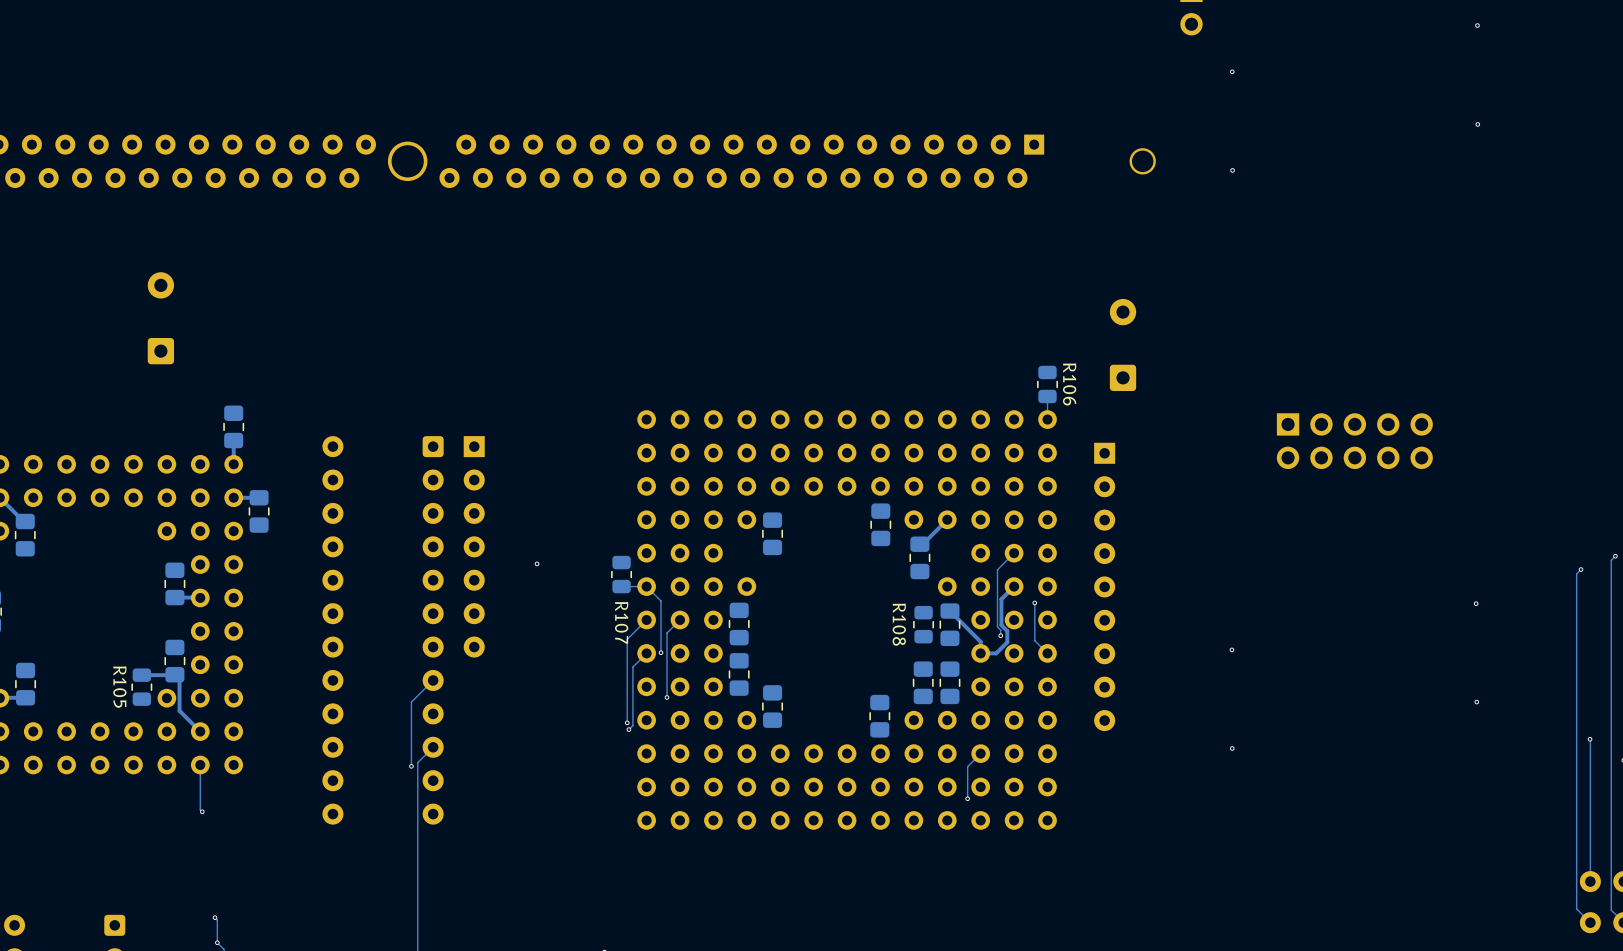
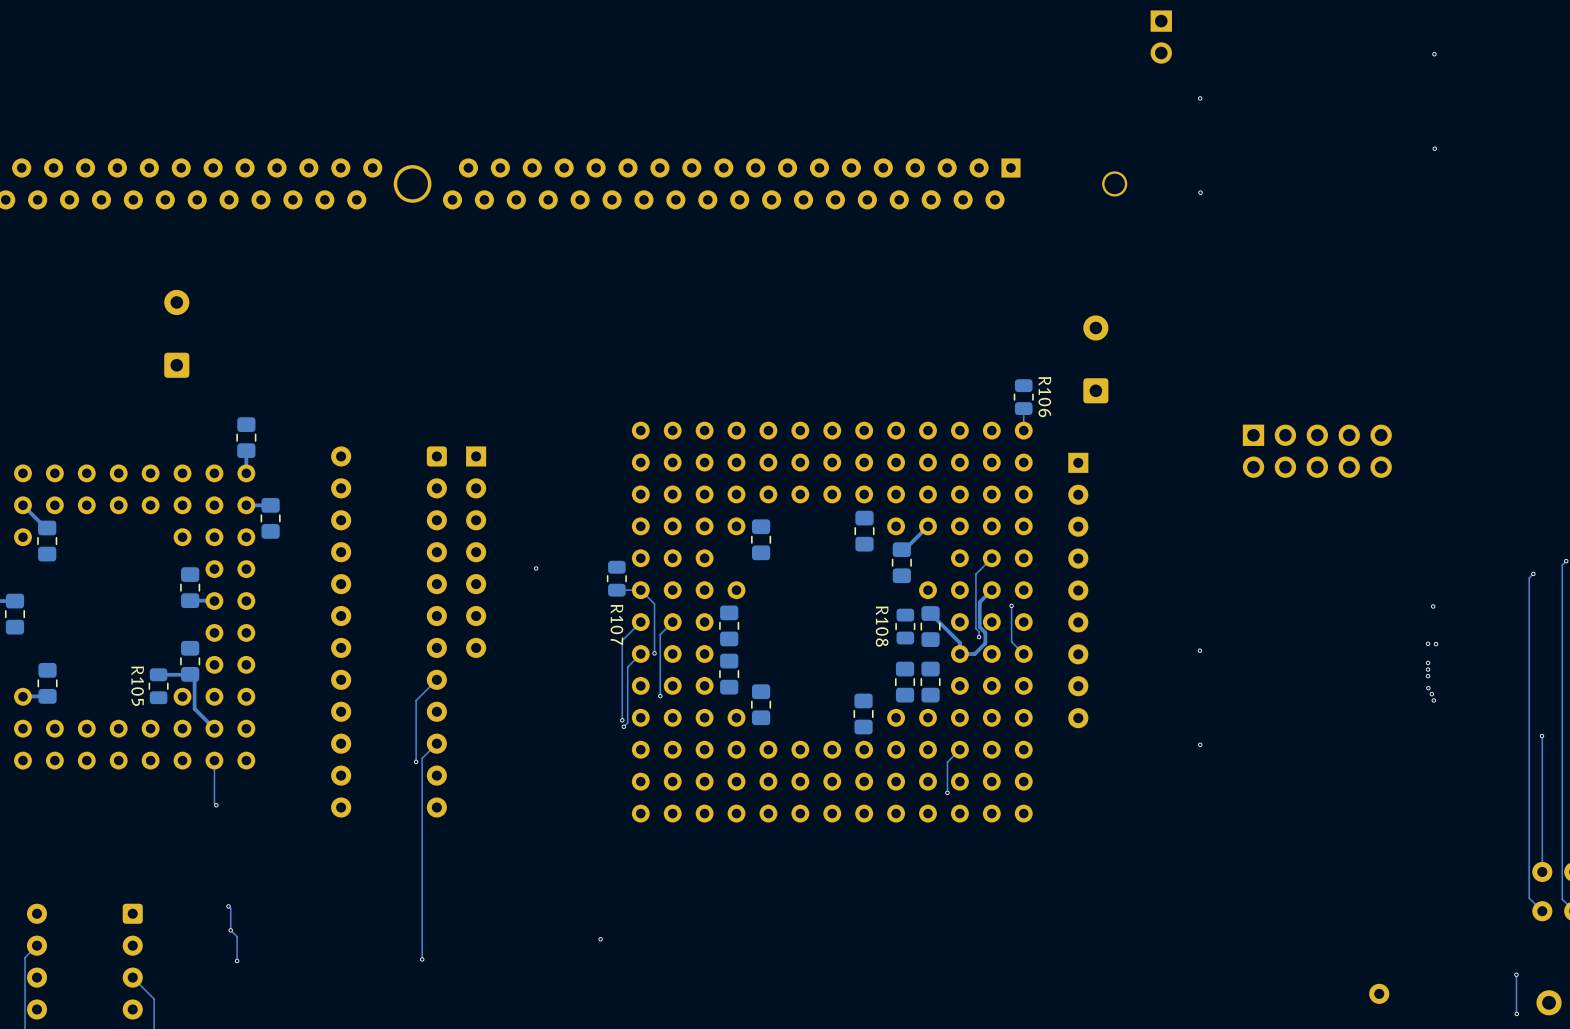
via: none -> (1428, 643)
via: none -> (1436, 644)
via: none -> (1428, 662)
via: none -> (1428, 669)
via: none -> (1428, 676)
via: none -> (1428, 688)
via: none -> (1431, 694)

